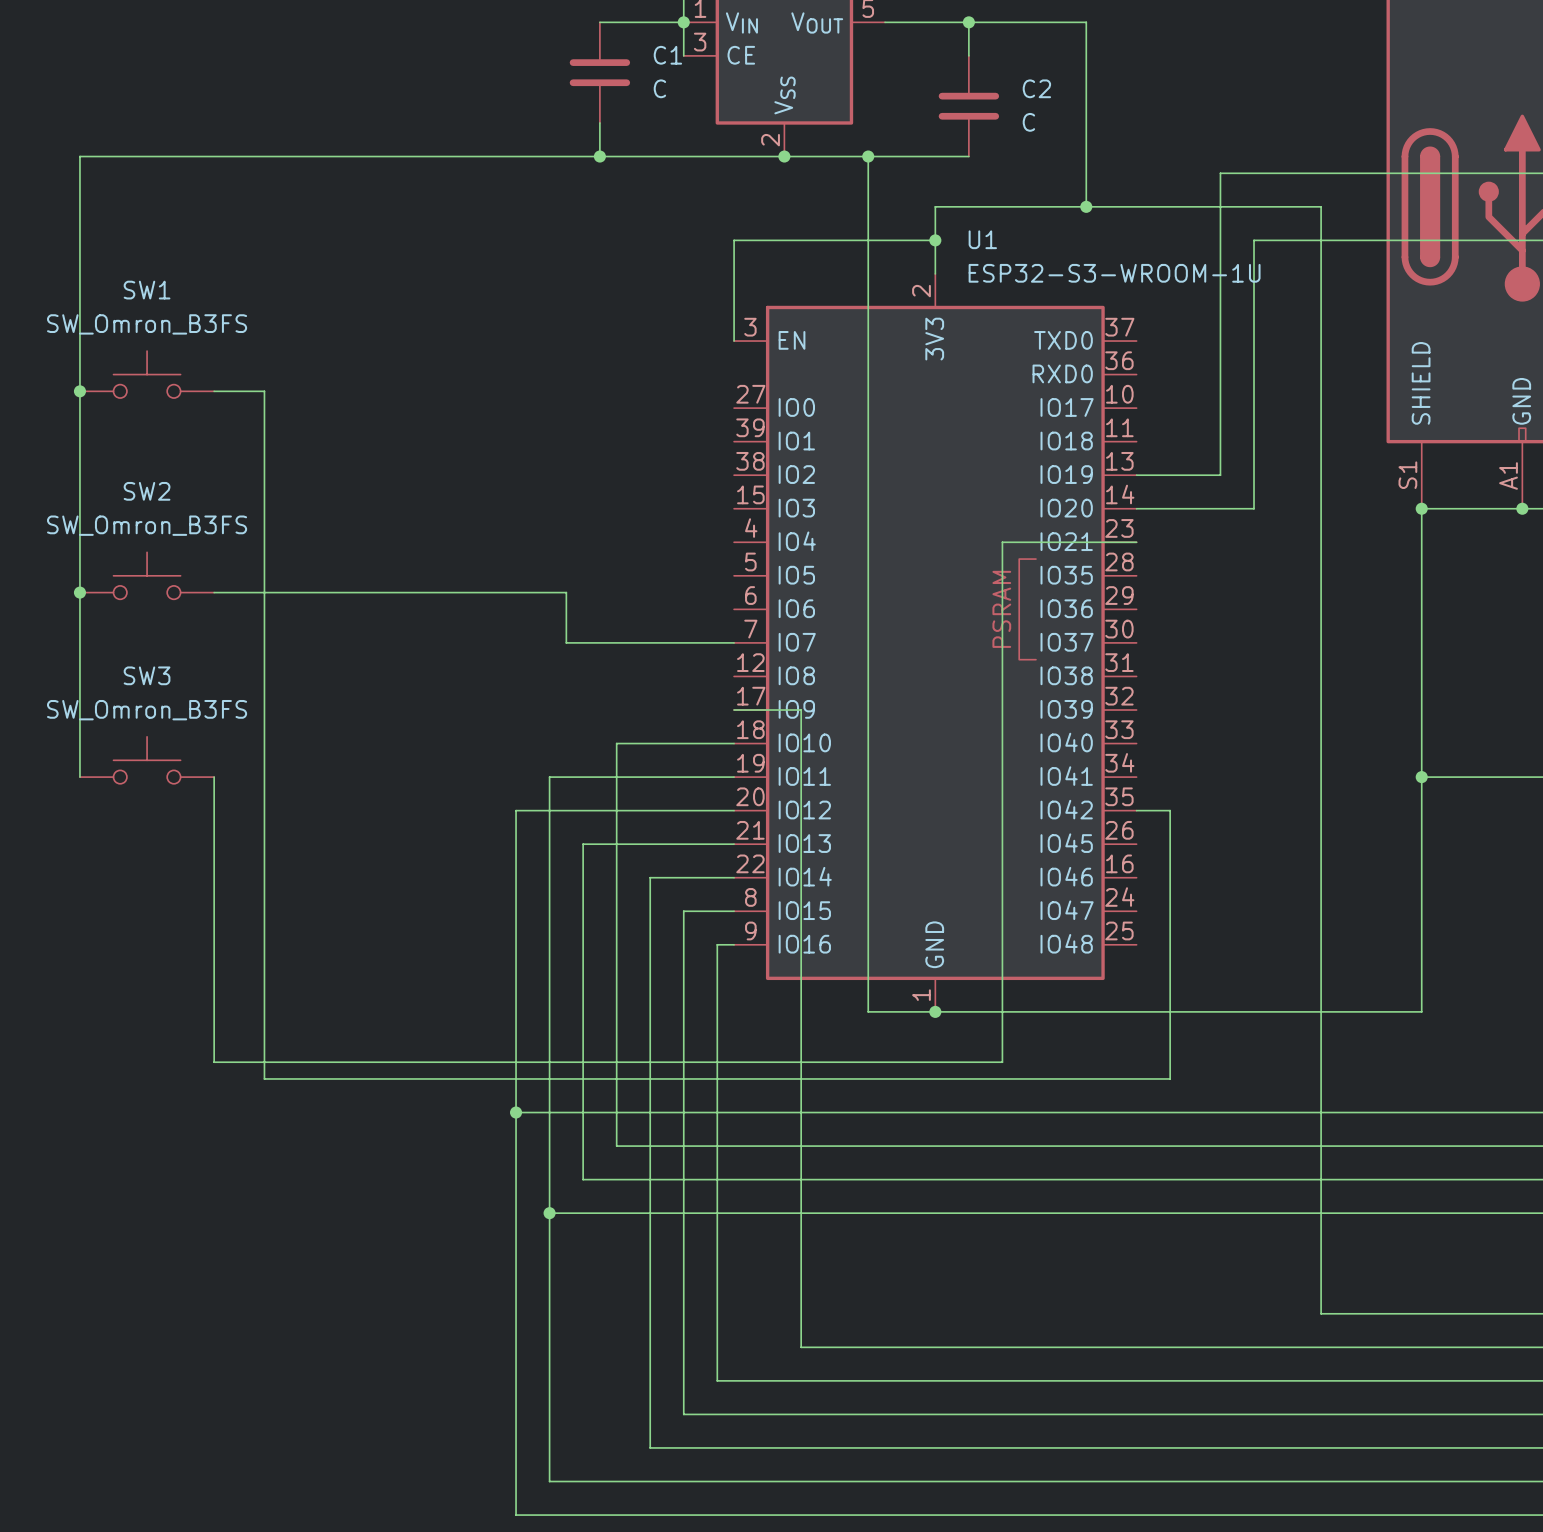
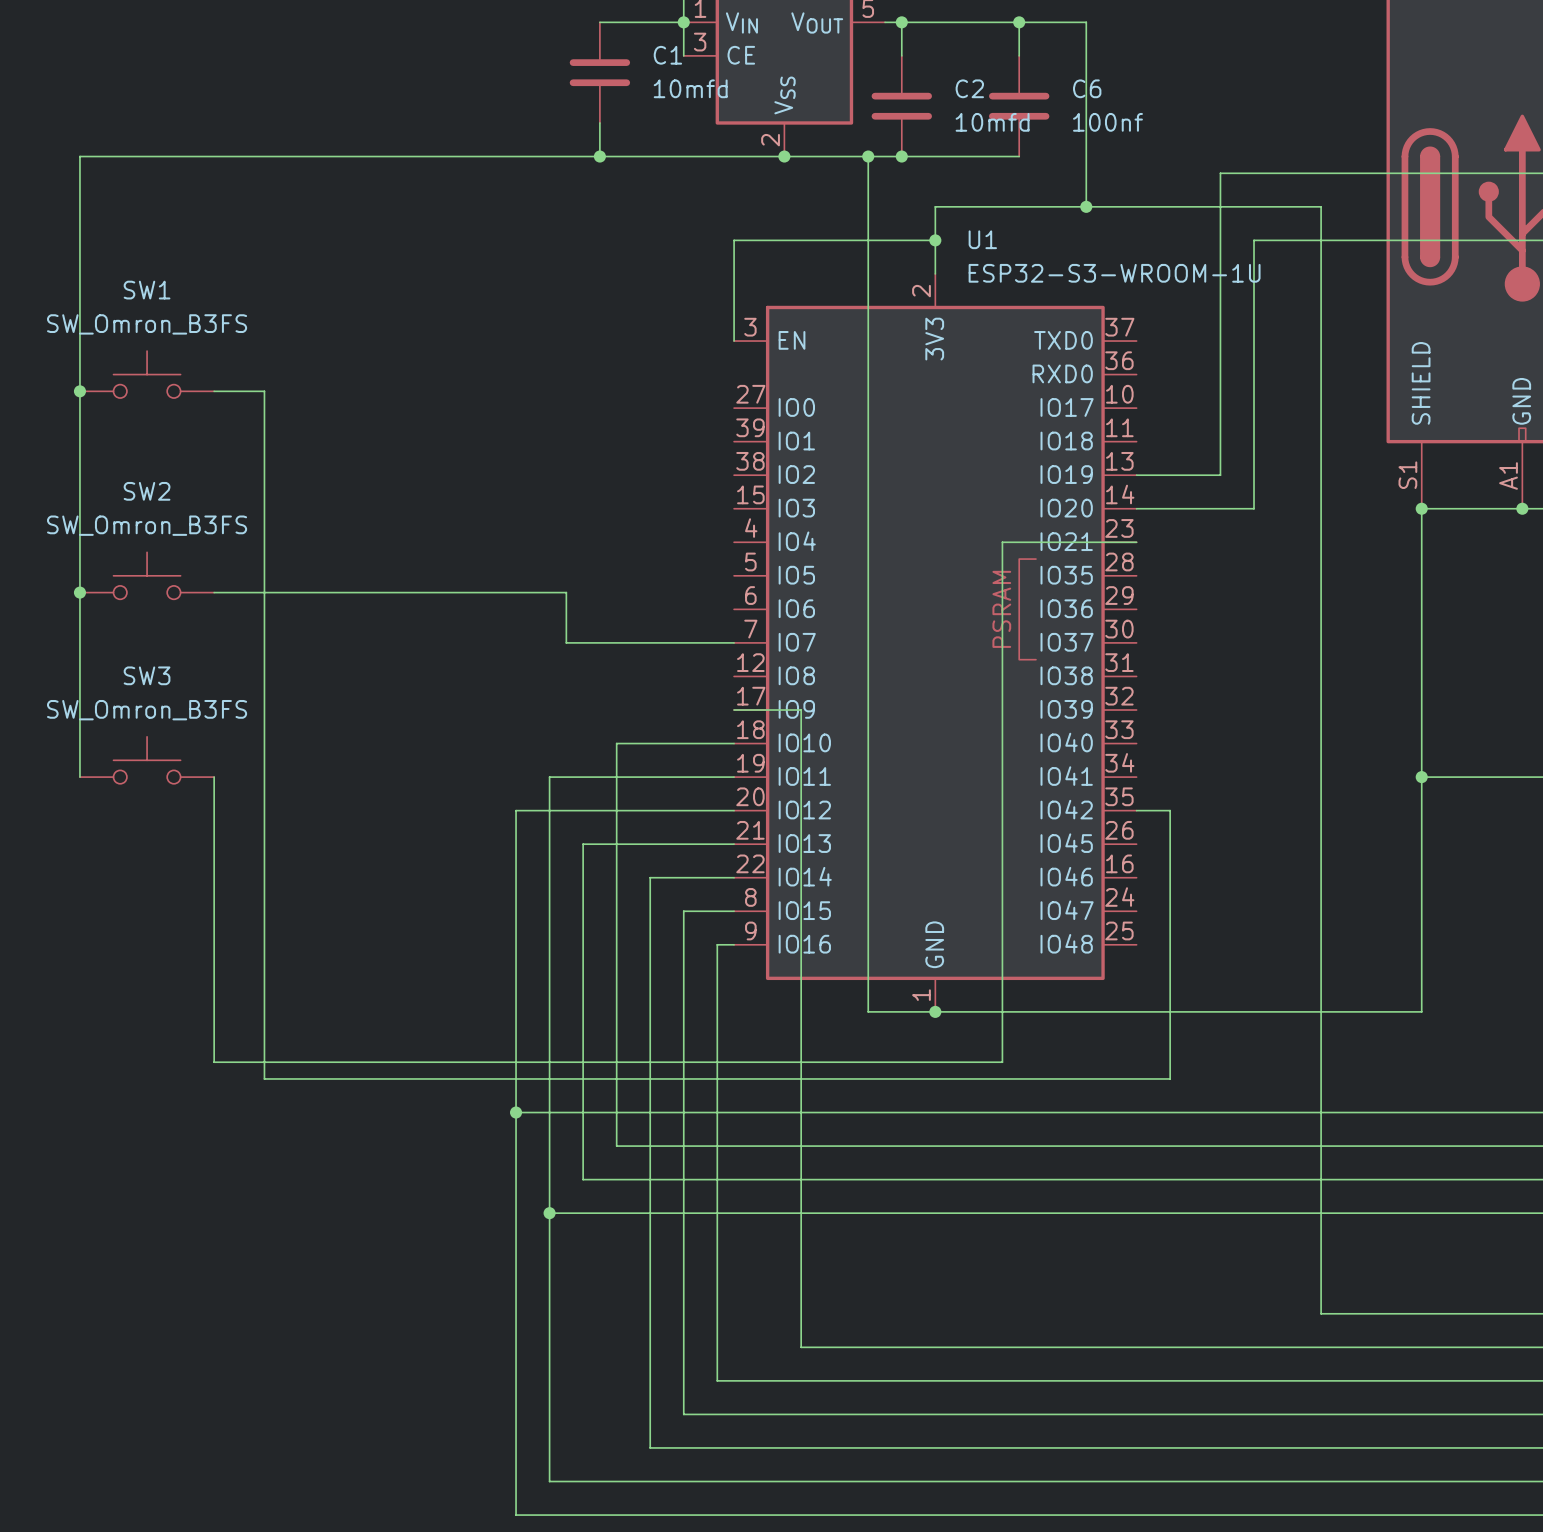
wire: none -> (901, 22) (901, 55)
junction: none -> (901, 22)
wire: (968, 22) (968, 55) -> (1019, 22) (1019, 55)
junction: (968, 22) -> none
junction: none -> (1019, 22)
C1 value: C (659, 88) -> 10mfd (690, 88)
C2 position: (968, 106) -> (901, 106)
C6: none -> 100nf (1019, 106)
C2 value: C (1028, 122) -> 10mfd (992, 122)
junction: none -> (901, 156)
wire: none -> (968, 156) (1019, 156)

